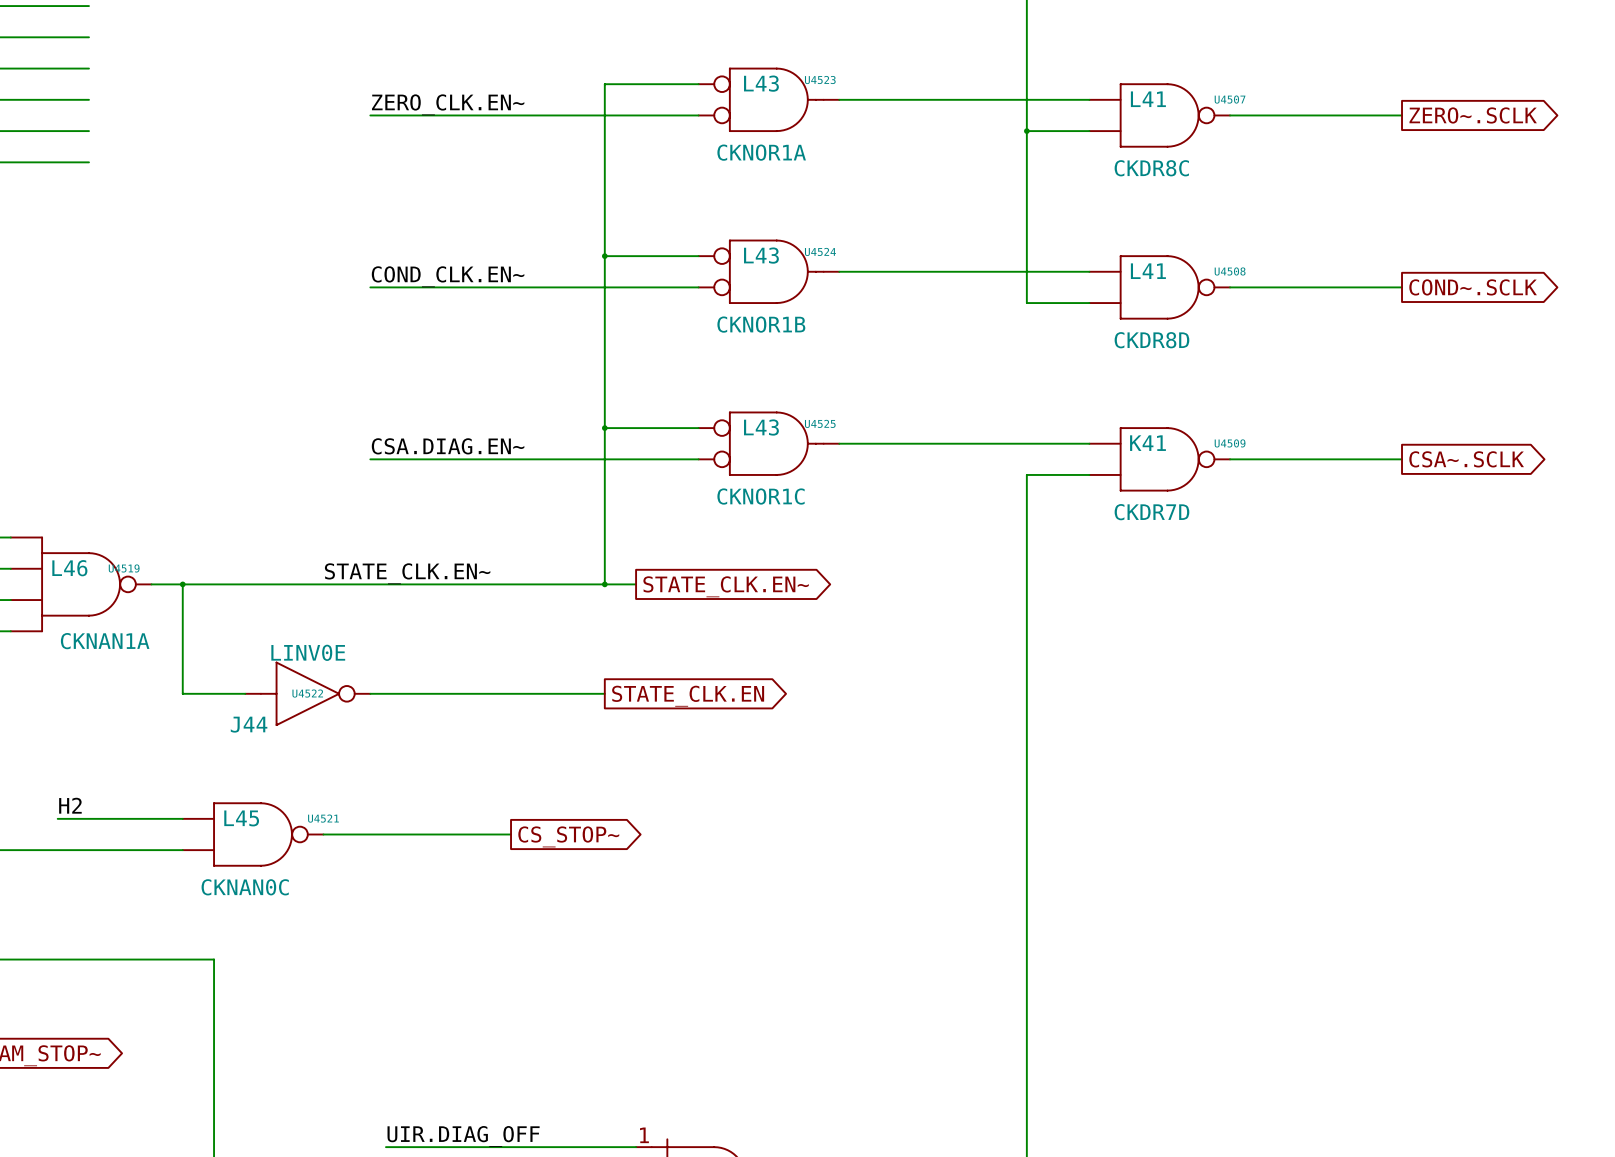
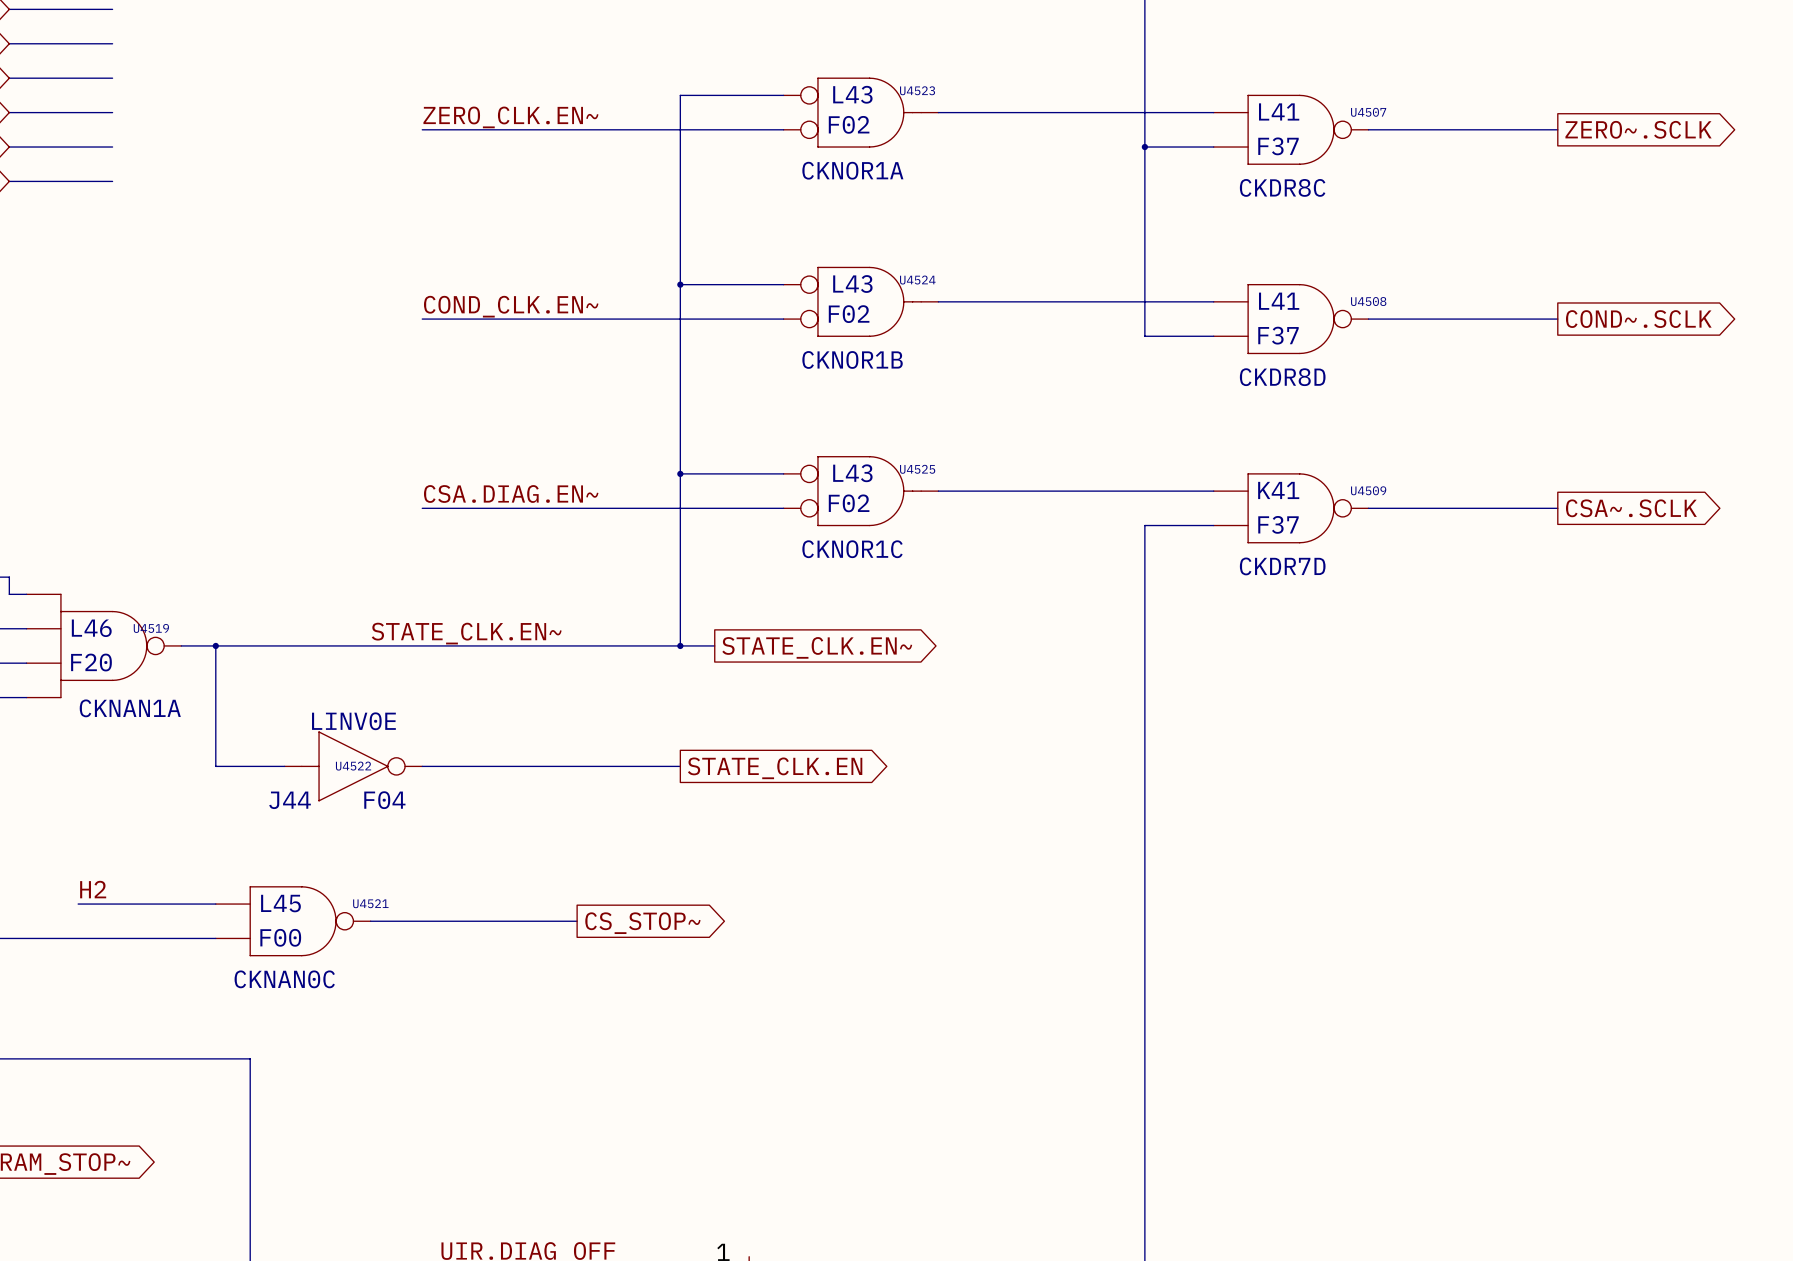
U4523 value: none -> F02 (849, 124)
U4507 value: none -> F37 (1278, 146)
U4524 value: none -> F02 (849, 314)
U4508 value: none -> F37 (1278, 335)
U4525 value: none -> F02 (849, 503)
U4509 value: none -> F37 (1278, 524)
U4519 value: none -> F20 (91, 662)
U4522 value: none -> F04 (384, 800)
U4521 value: none -> F00 (280, 937)

